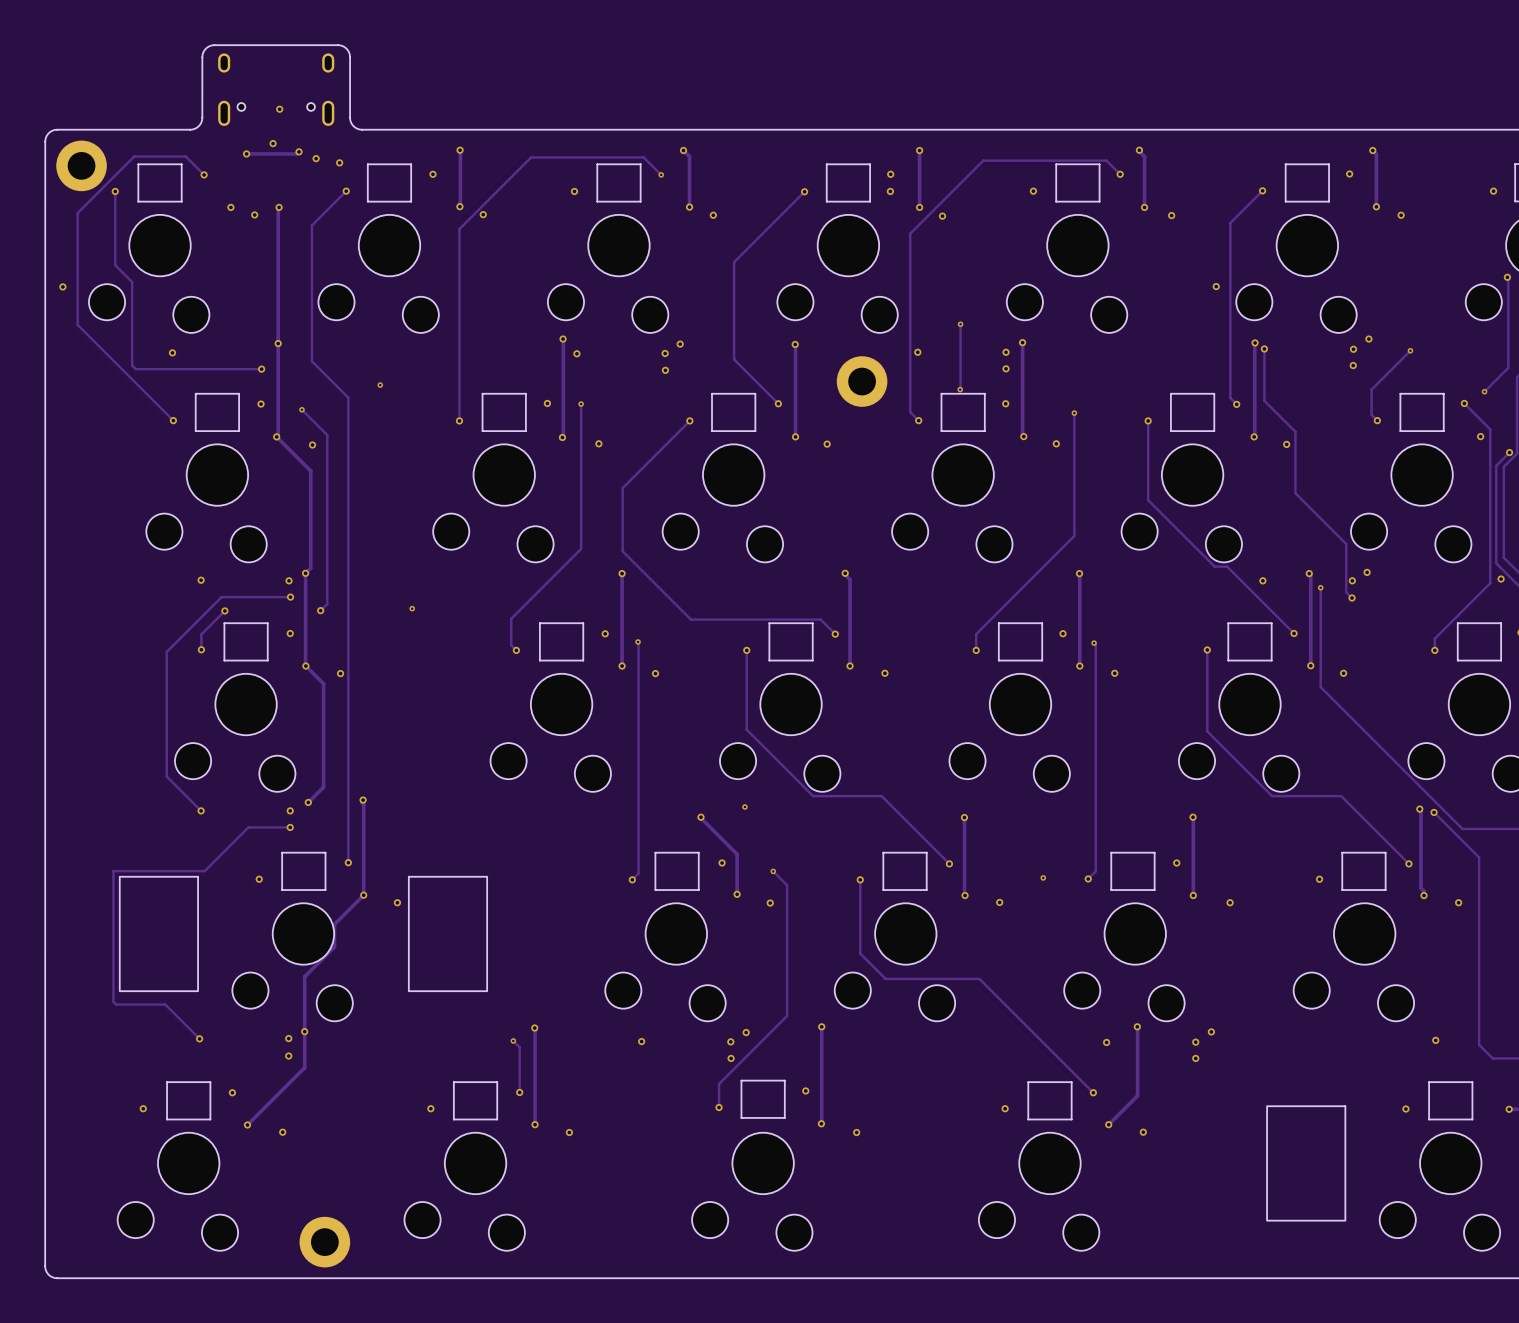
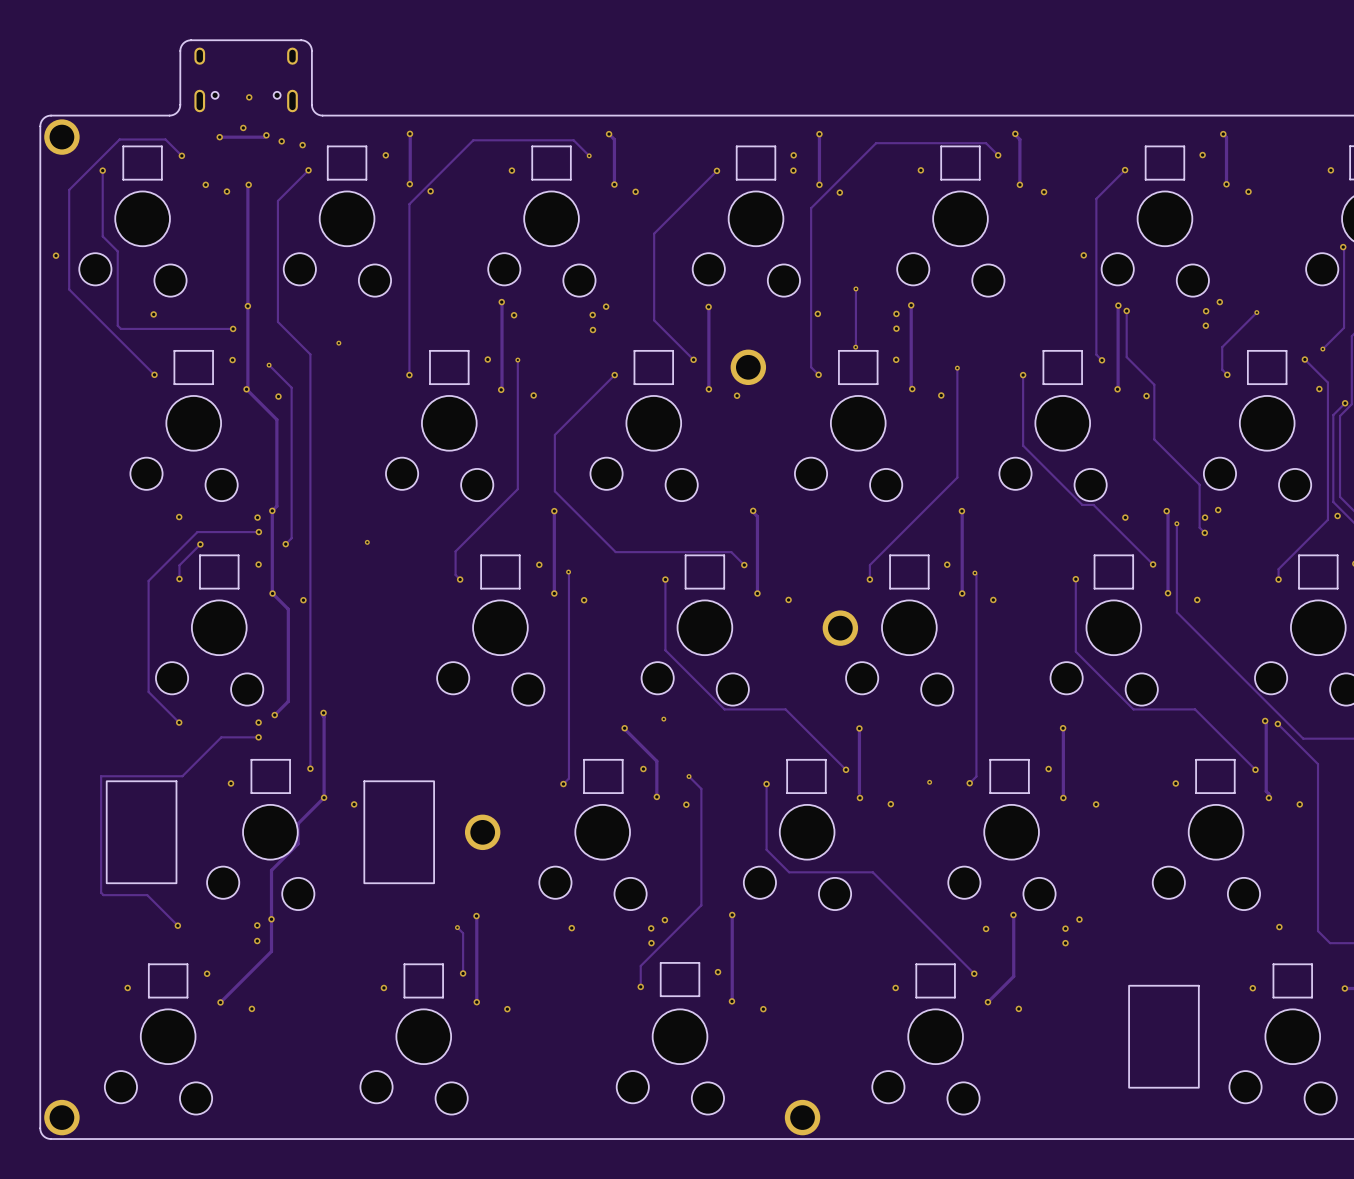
part: none -> (61, 137)
part: (81, 165) -> none
part: (862, 381) -> none
part: none -> (748, 367)
part: none -> (840, 628)
part: none -> (482, 832)
part: (324, 1242) -> none
part: none -> (61, 1117)
part: none -> (802, 1117)

